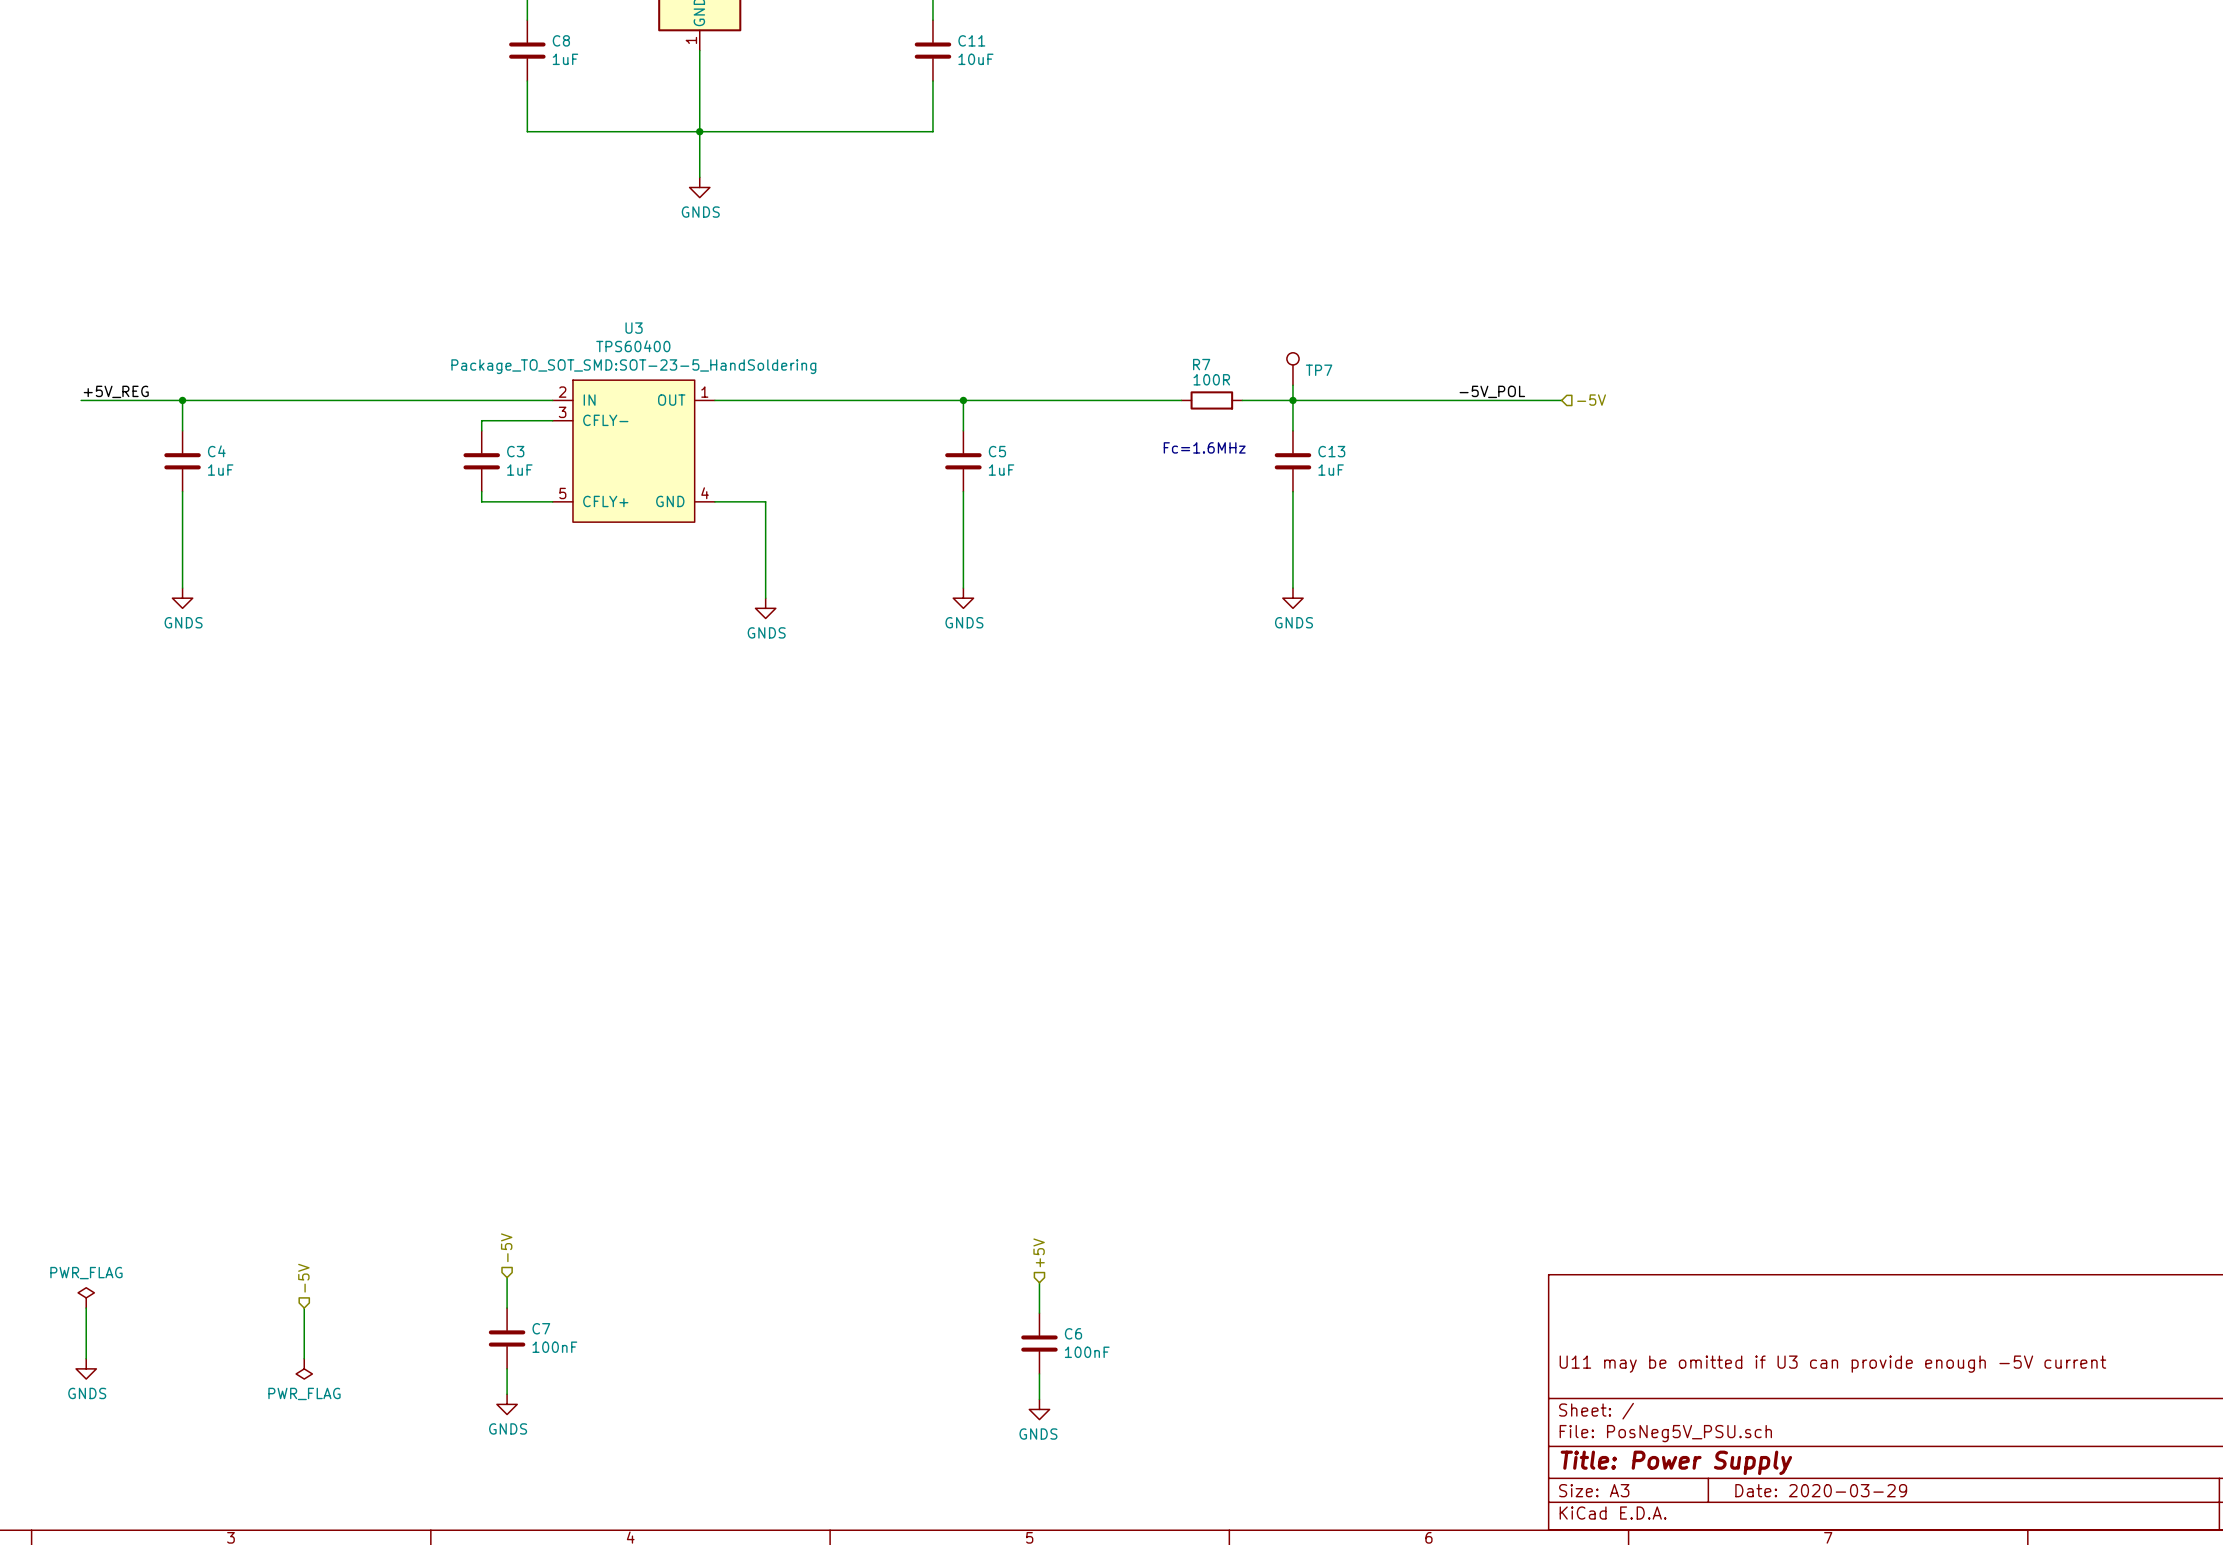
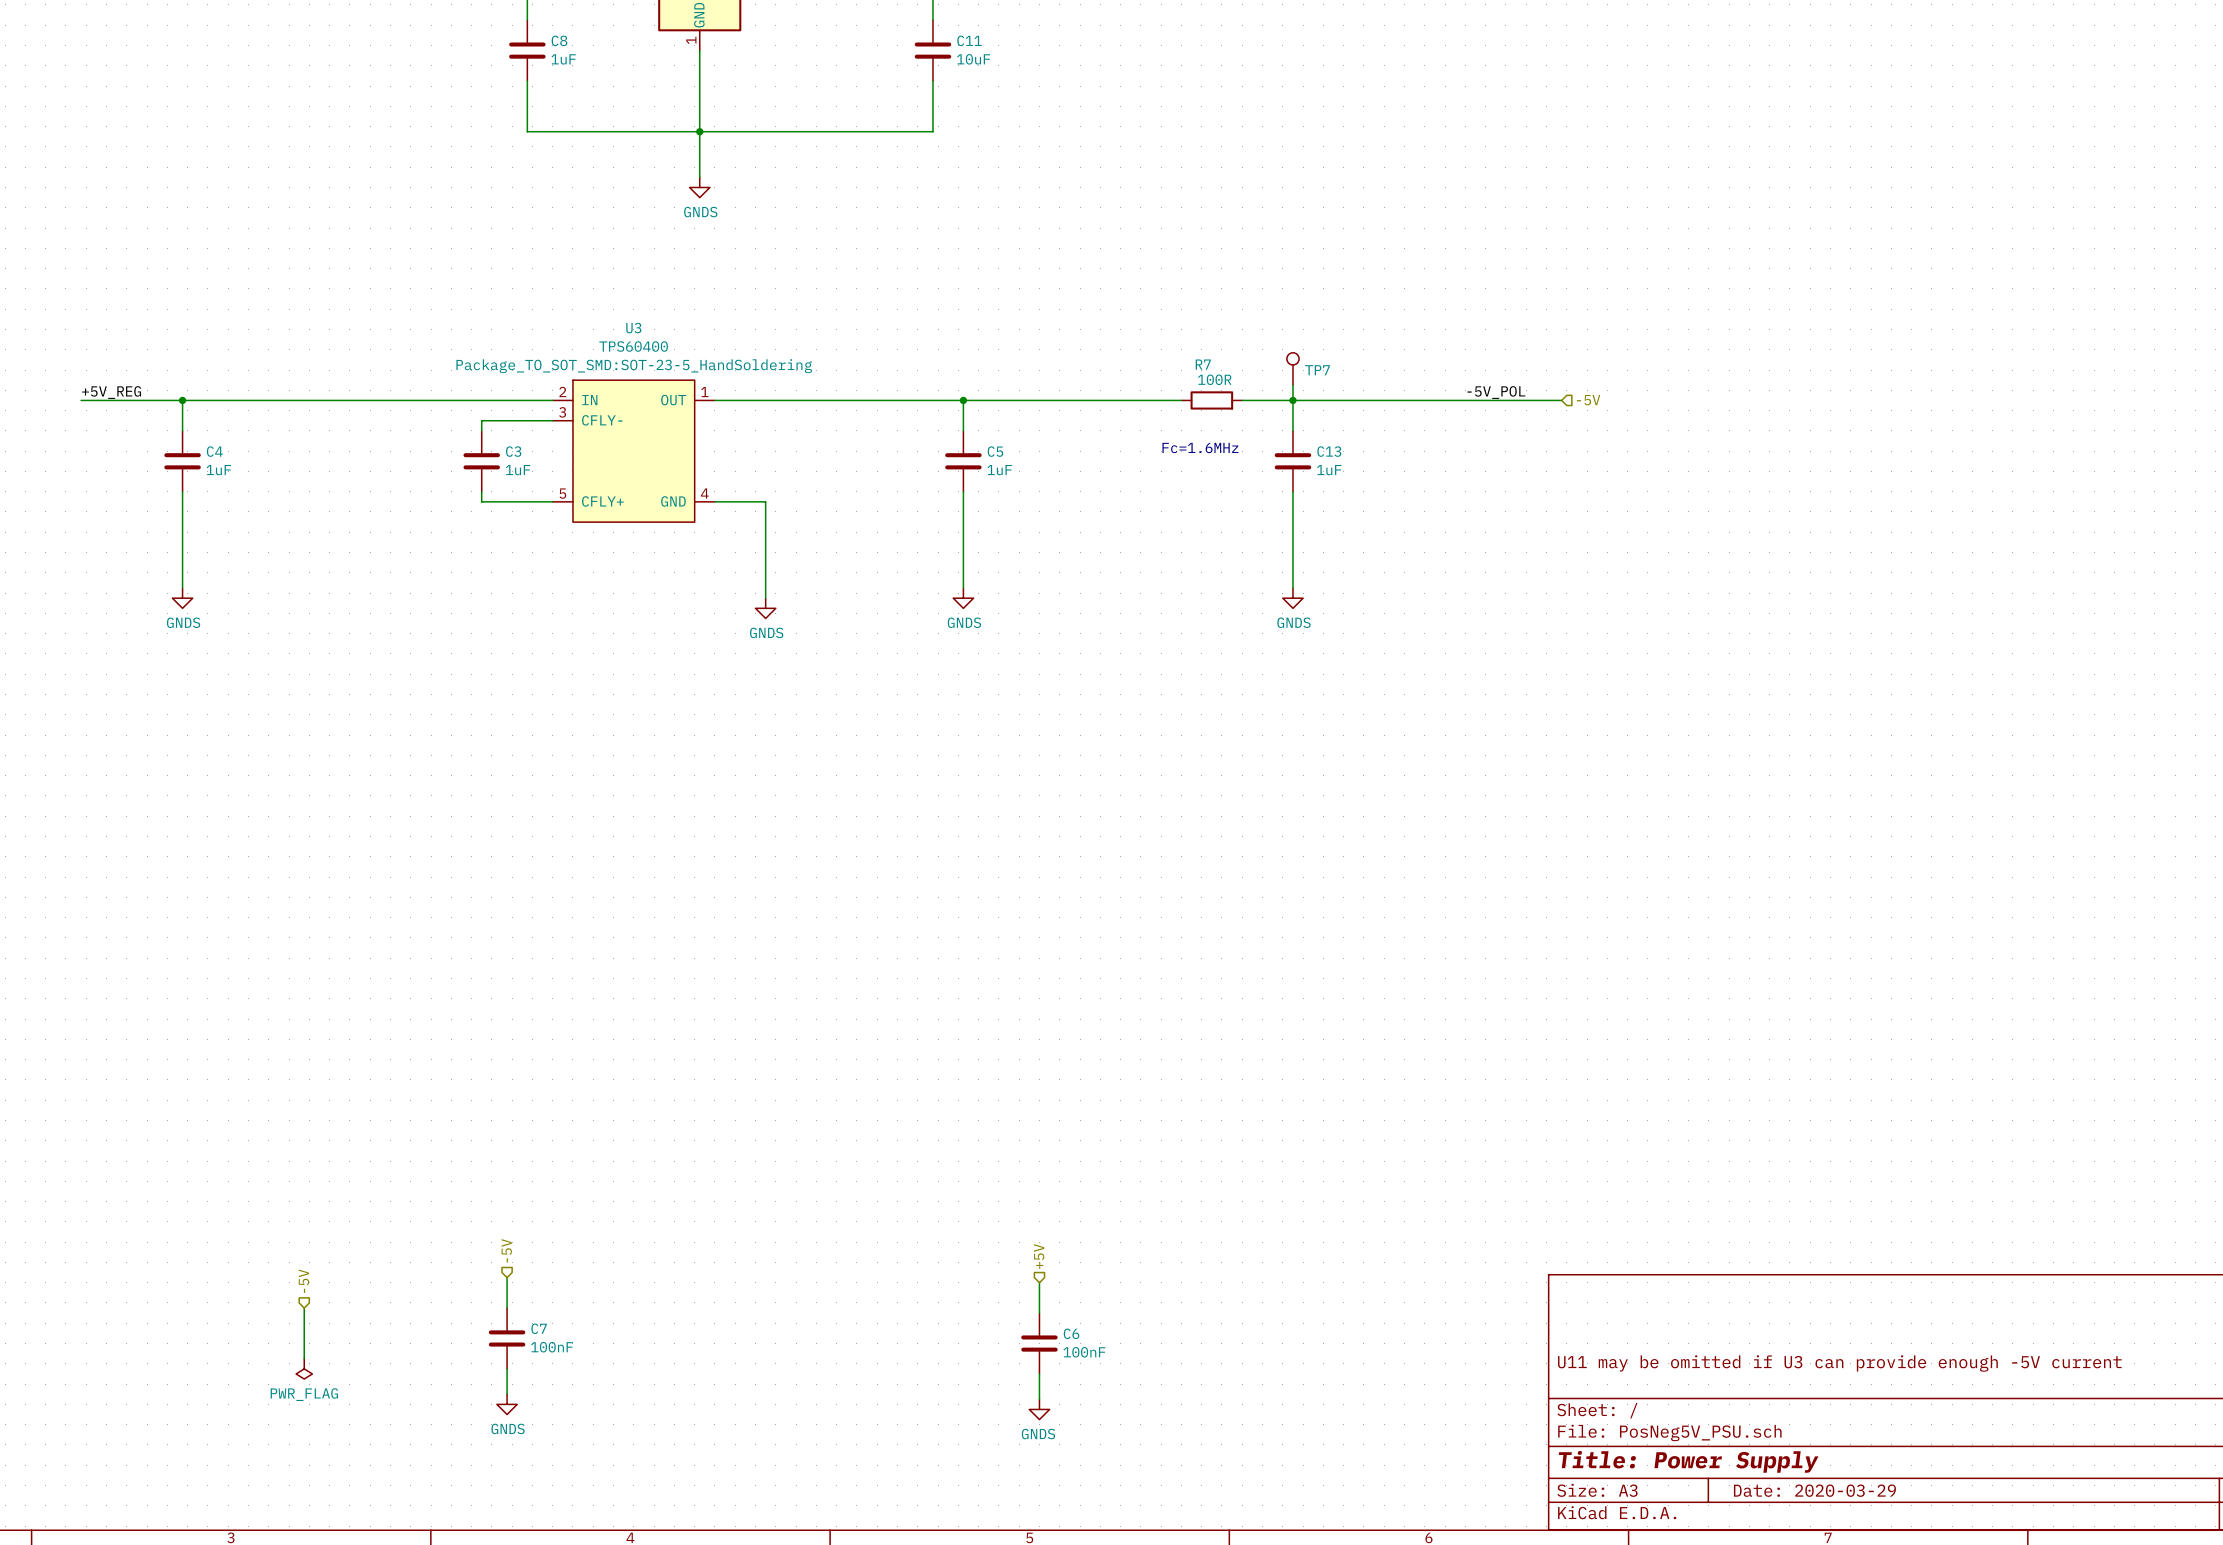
power symbol: PWR_FLAG (86, 1297) -> none
wire: (86, 1308) (86, 1358) -> none
power symbol: GNDS (86, 1368) -> none

